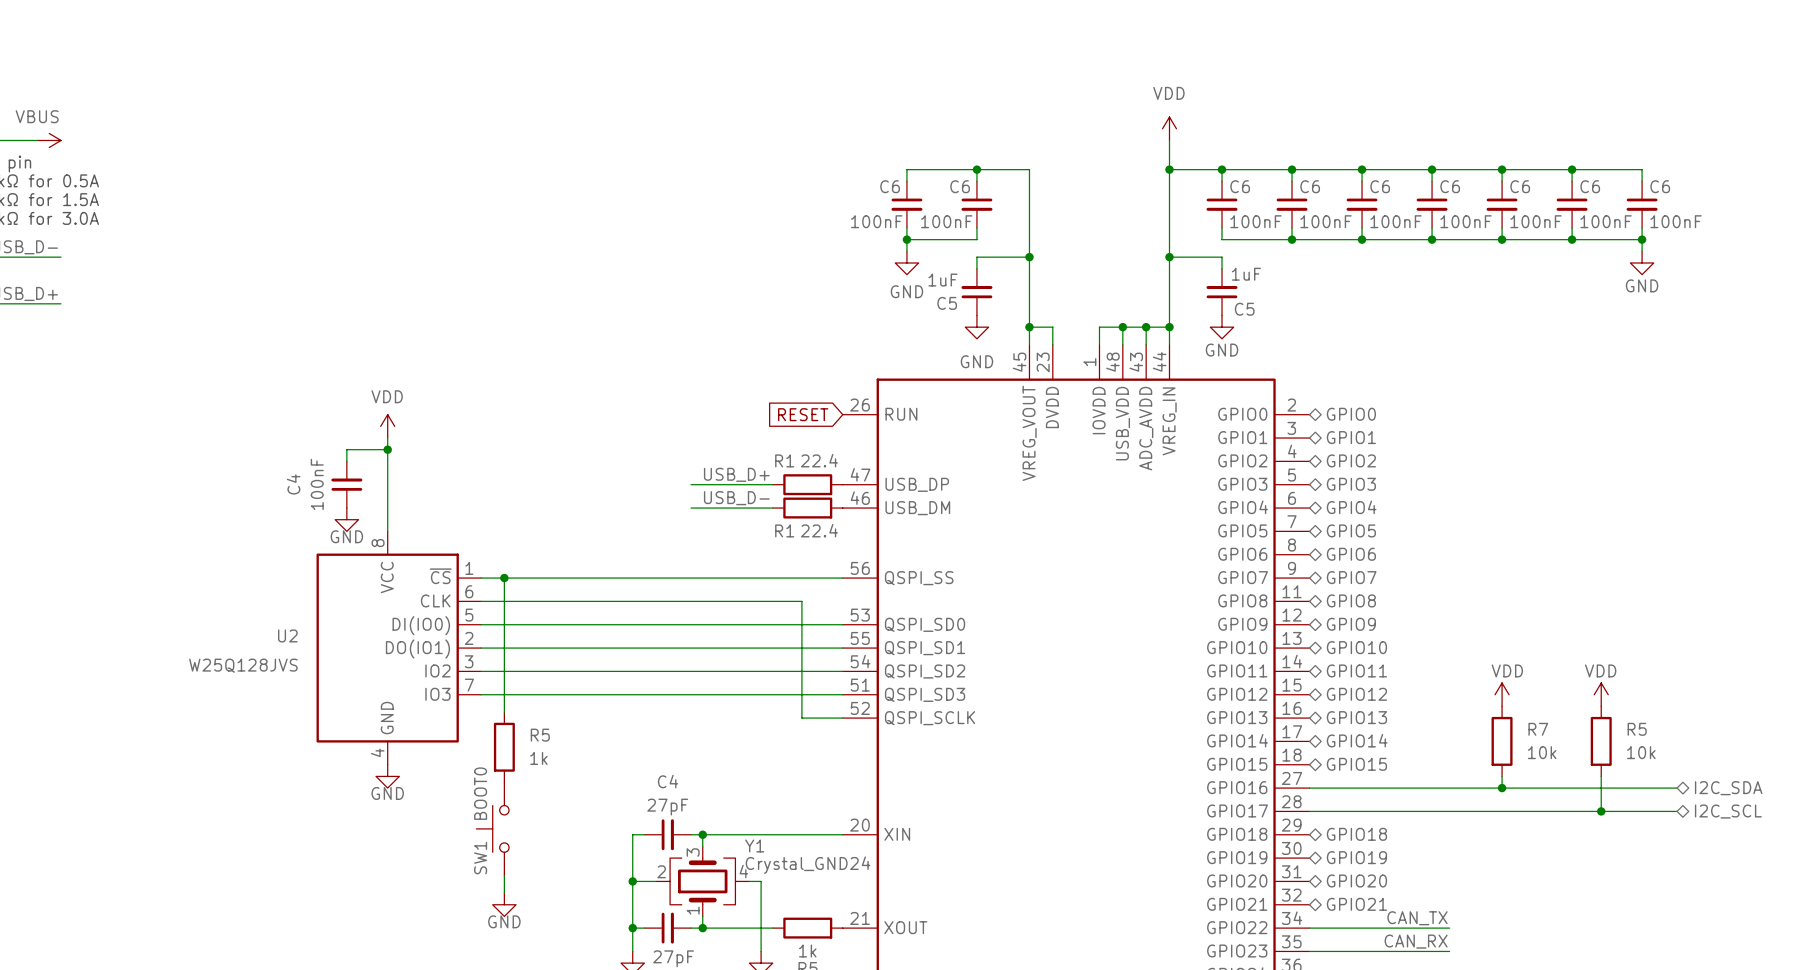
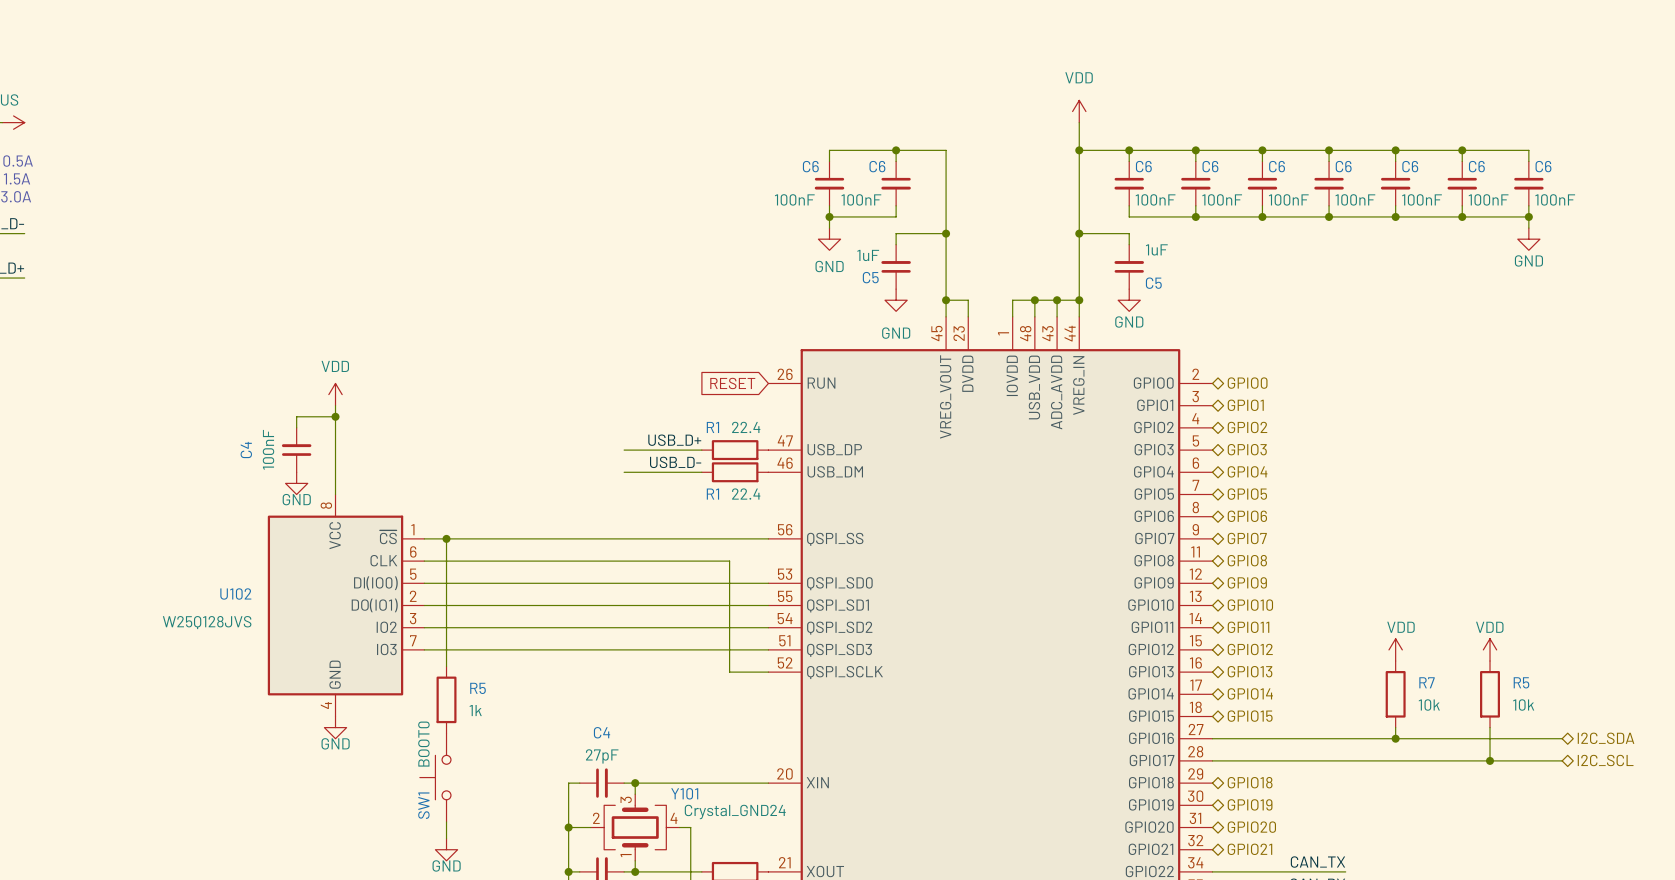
U2 name: U2 (287, 635) -> U102 (235, 593)
Y1 name: Y1 (754, 845) -> Y101 (684, 793)

